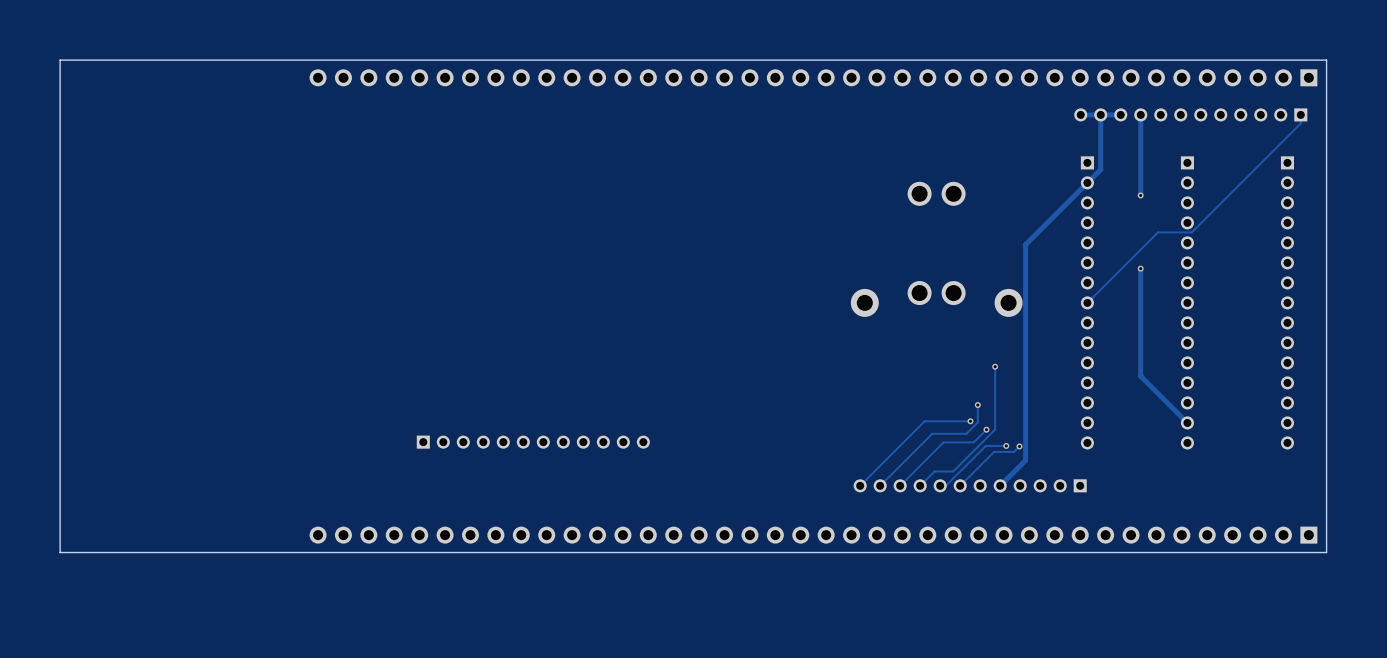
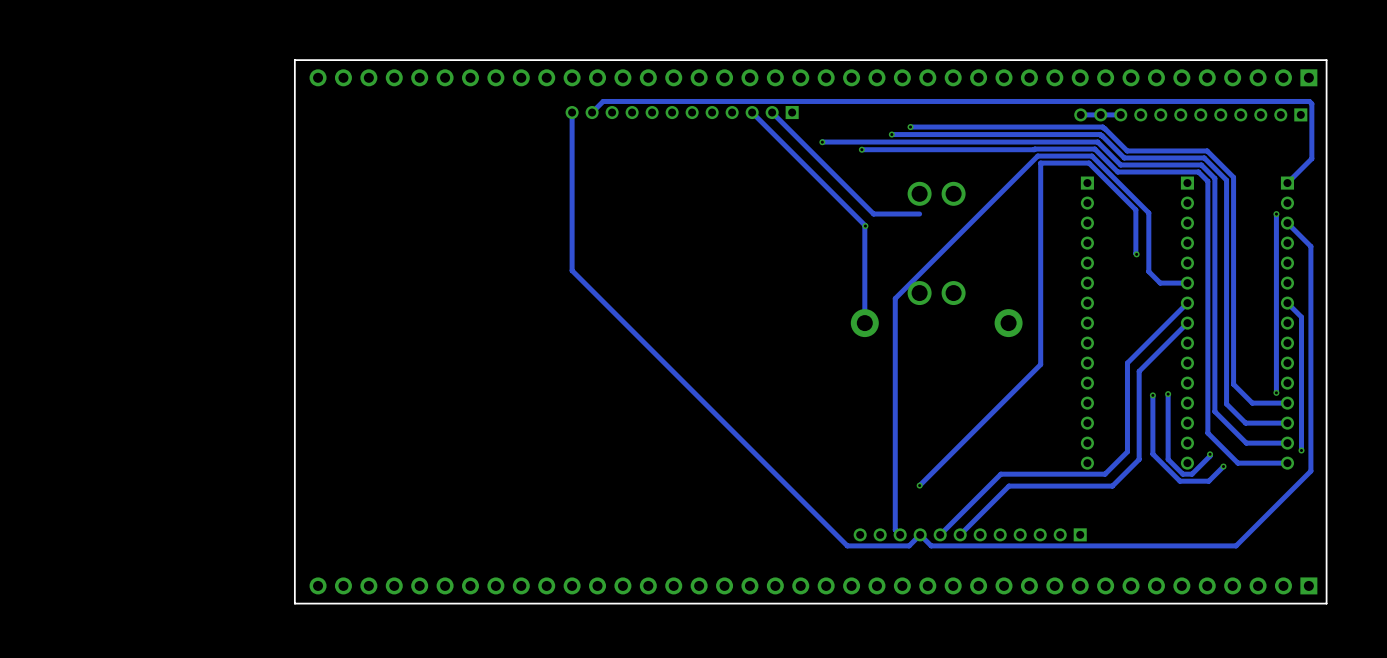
board edge: (294, 60) (60, 60) (60, 552) (1326, 552) -> (294, 60) (294, 603) (1326, 603) (1326, 552)
track: none -> (572, 112) (572, 270) (847, 545) (909, 545) (920, 534) (931, 545) (1236, 545) (1310, 471) (1310, 246) (1287, 223)
track: none -> (592, 112) (603, 101) (1309, 101) (1311, 103) (1311, 158) (1287, 183)
part: none -> (682, 112)
track: none -> (752, 112) (865, 226)
track: none -> (772, 112) (873, 214) (919, 214)
track: (1100, 114) (1100, 169) (1025, 244) (1025, 460) (1000, 485) -> none
track: (1140, 114) (1140, 195) -> none
track: (1300, 114) (1300, 123) (1191, 232) (1157, 232) (1087, 302) -> none
track: none -> (910, 127) (1102, 127) (1127, 150) (1207, 150) (1233, 177) (1233, 384) (1252, 403) (1287, 403)
via: none -> (910, 127)
track: none -> (891, 134) (1100, 134) (1124, 157) (1204, 157) (1226, 180) (1226, 404) (1245, 423) (1287, 423)
via: none -> (891, 134)
track: none -> (822, 142) (1097, 142) (1120, 164) (1201, 164) (1214, 178) (1214, 411) (1246, 443) (1287, 443)
via: none -> (822, 142)
track: none -> (861, 149) (1094, 149) (1117, 172) (1198, 172) (1207, 181) (1207, 433) (1237, 463) (1287, 463)
via: none -> (861, 149)
via: (1140, 195) -> none
track: none -> (1276, 214) (1276, 392)
via: none -> (1276, 214)
track: none -> (864, 226) (864, 323)
via: none -> (865, 226)
track: none -> (1136, 254) (1135, 209) (1089, 163) (1040, 163) (1040, 364) (919, 485)
track: (1140, 268) (1140, 376) (1187, 422) -> none
via position: (1140, 268) -> (1136, 254)
track: none -> (1187, 283) (1160, 283) (1148, 271) (1148, 212) (1091, 156) (1037, 156) (895, 298) (895, 529) (900, 534)
part position: (864, 302) -> (864, 323)
part position: (1008, 302) -> (1008, 323)
part position: (1087, 302) -> (1087, 323)
part position: (1187, 302) -> (1187, 323)
part position: (1287, 302) -> (1287, 323)
track: none -> (1187, 303) (1127, 363) (1127, 451) (1105, 474) (1000, 474) (940, 534)
track: none -> (1287, 303) (1301, 317) (1301, 450)
track: none -> (1187, 323) (1139, 371) (1139, 459) (1112, 486) (1008, 486) (960, 534)
track: (995, 366) (995, 429) (953, 471) (934, 471) (920, 485) -> none
via: (995, 366) -> none
via: none -> (1276, 392)
track: none -> (1168, 394) (1168, 459) (1182, 474) (1192, 474) (1210, 454)
via: none -> (1168, 394)
track: none -> (1152, 395) (1152, 454) (1179, 481) (1208, 481) (1223, 466)
via: none -> (1152, 395)
track: (977, 405) (977, 422) (966, 433) (932, 433) (880, 485) -> none
via: (977, 405) -> none
track: (970, 421) (924, 421) (860, 485) -> none
via: (970, 421) -> none
track: (986, 429) (973, 442) (943, 442) (900, 485) -> none
via: (986, 429) -> none
part: (533, 442) -> none
track: (1006, 445) (985, 445) (945, 485) (940, 485) -> none
via: (1006, 445) -> none
track: (1018, 446) (1014, 451) (994, 451) (960, 485) -> none
via: (1019, 446) -> none
via: none -> (1301, 450)
via: none -> (1210, 454)
via: none -> (1223, 466)
via: none -> (919, 485)
part position: (970, 485) -> (970, 534)
part position: (813, 535) -> (813, 585)

